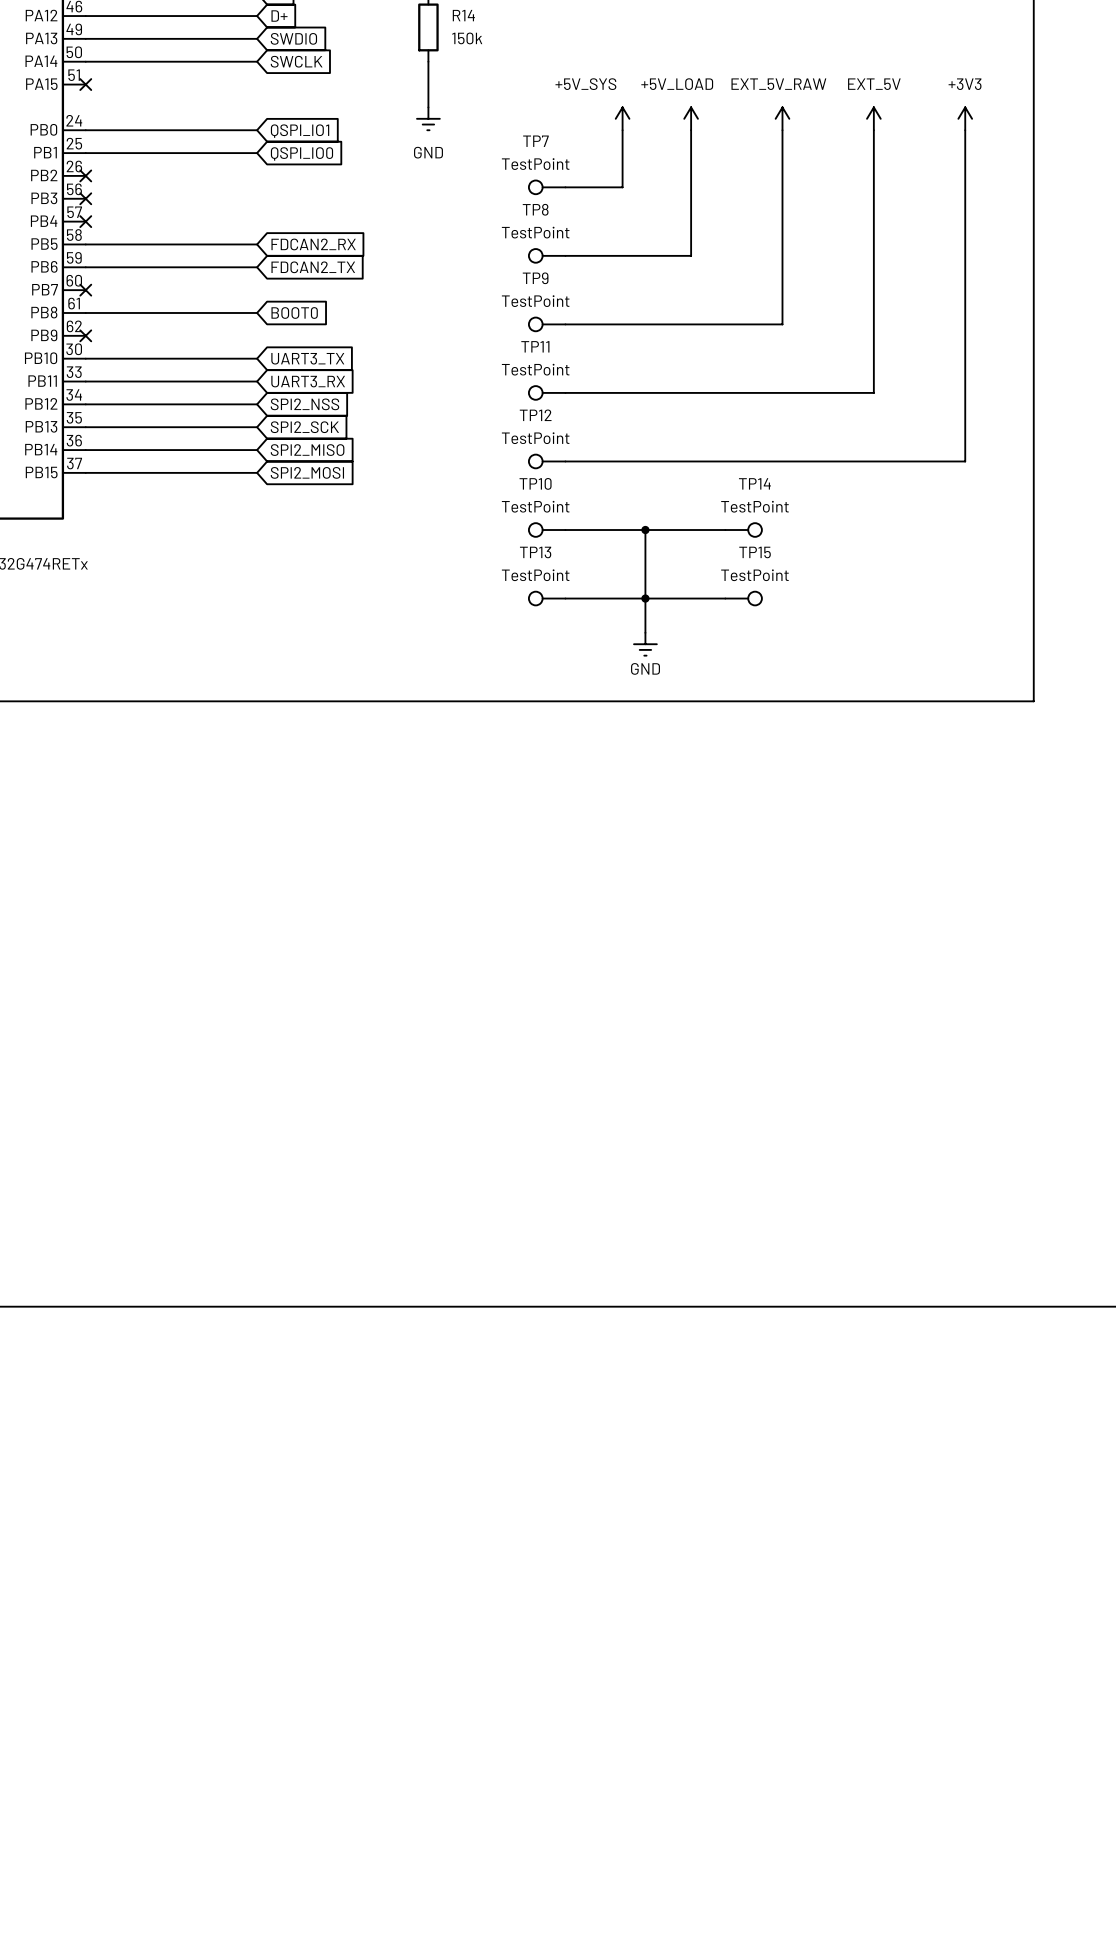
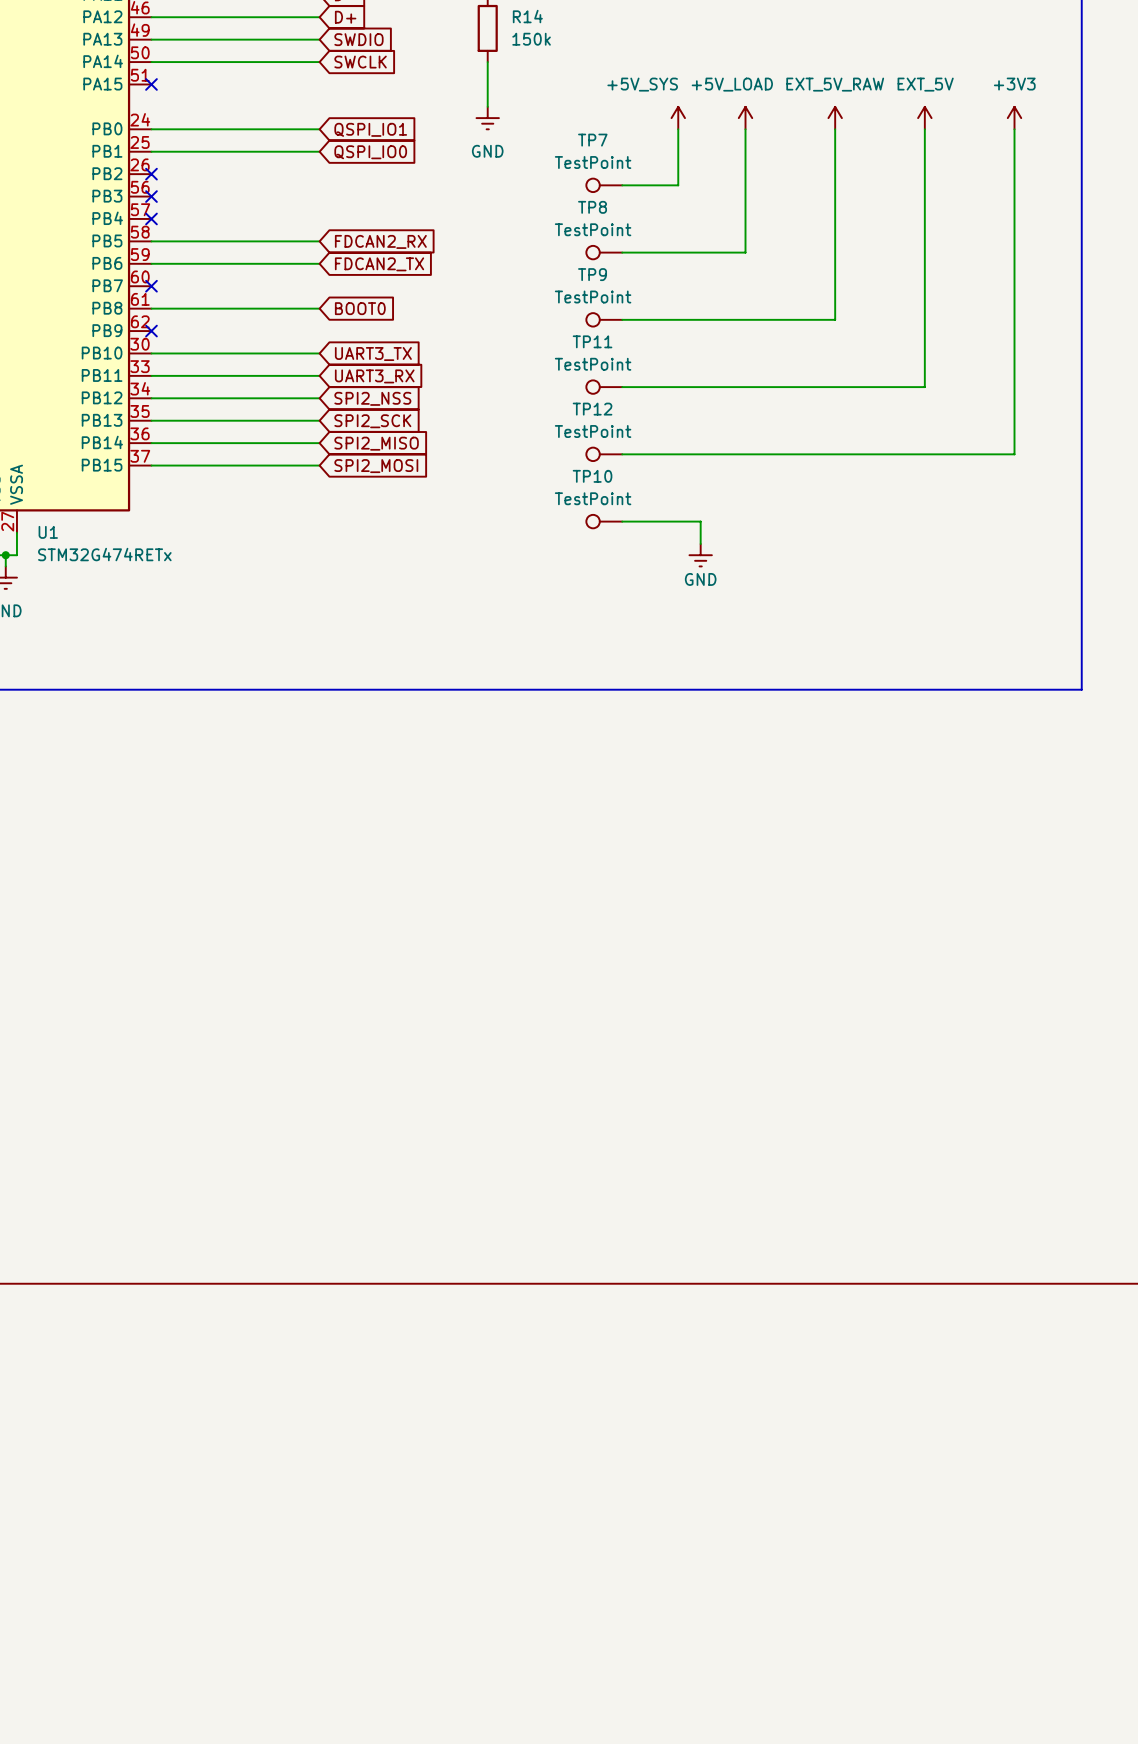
wire: (645, 530) (725, 530) -> none
junction: (645, 530) -> none
TP14: TestPoint (743, 530) -> none
wire: (645, 552) (645, 632) -> none
TP13: TestPoint (547, 598) -> none
wire: (565, 598) (725, 598) -> none
junction: (645, 598) -> none
TP15: TestPoint (743, 598) -> none
power symbol position: GND (645, 644) -> GND (700, 555)

